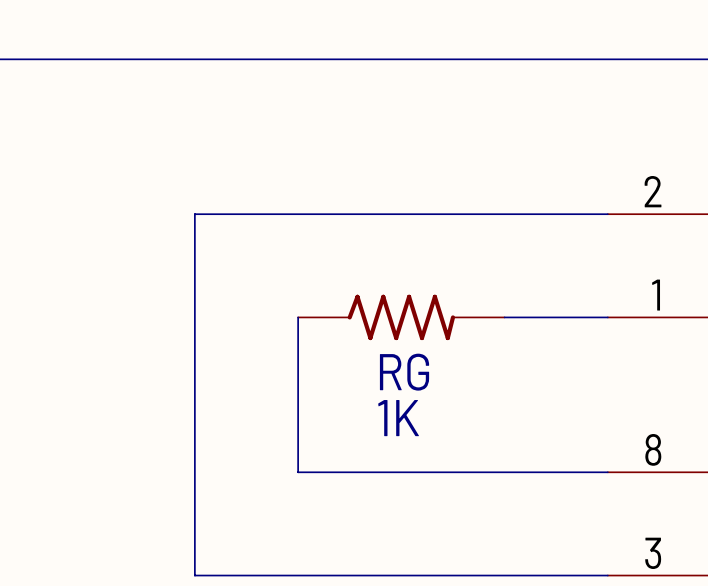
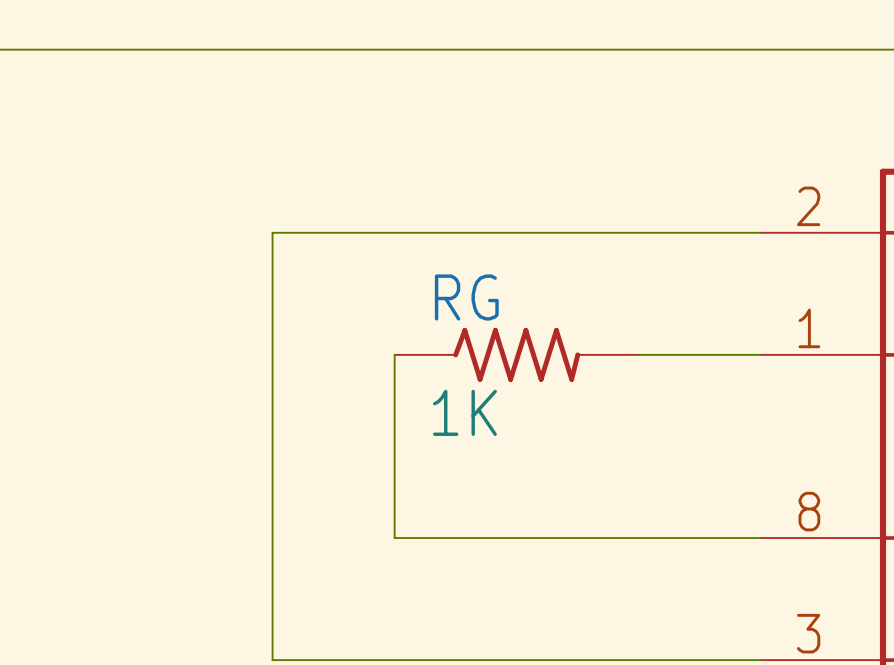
RG name position: RG (404, 372) -> RG (466, 297)
RG value position: 1K (398, 418) -> 1K (464, 412)

